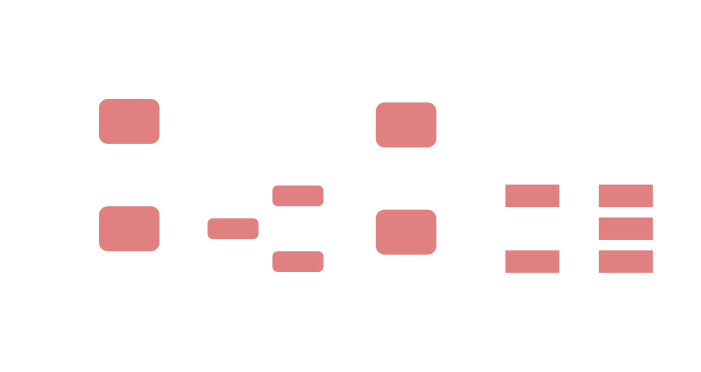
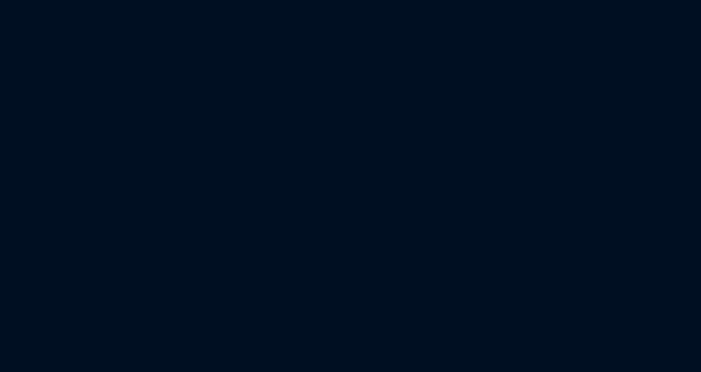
part: (129, 175) -> none
part: (406, 178) -> none
part: (265, 228) -> none
part: (579, 228) -> none

